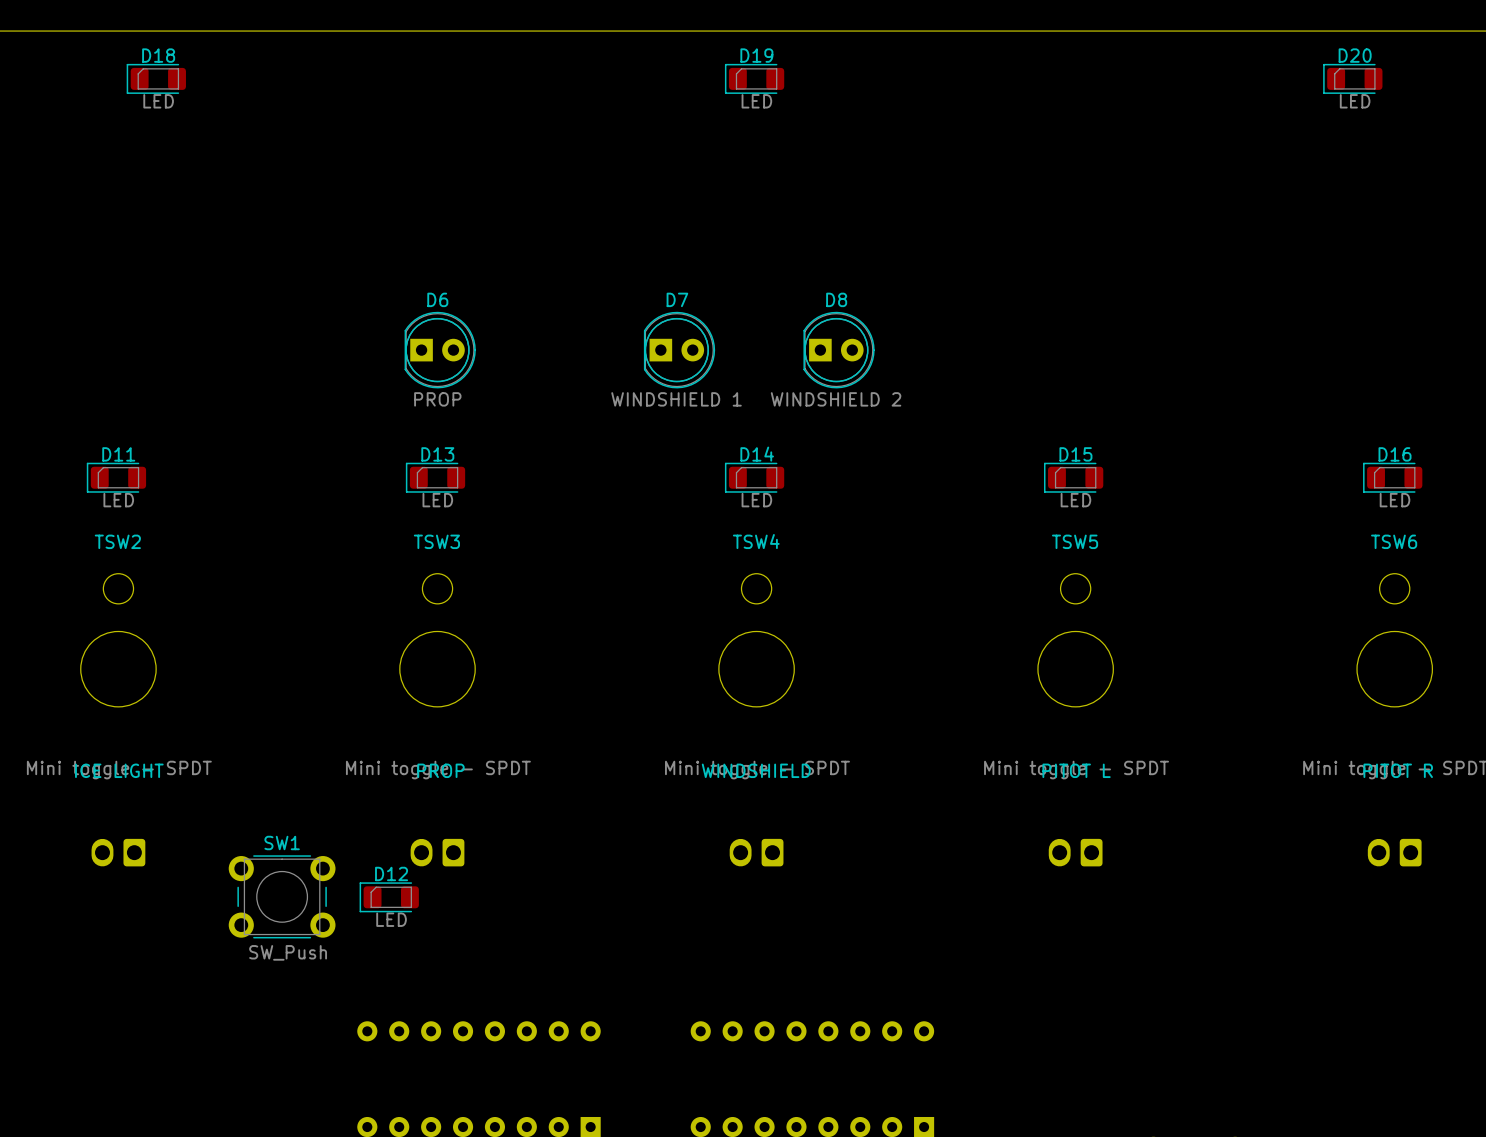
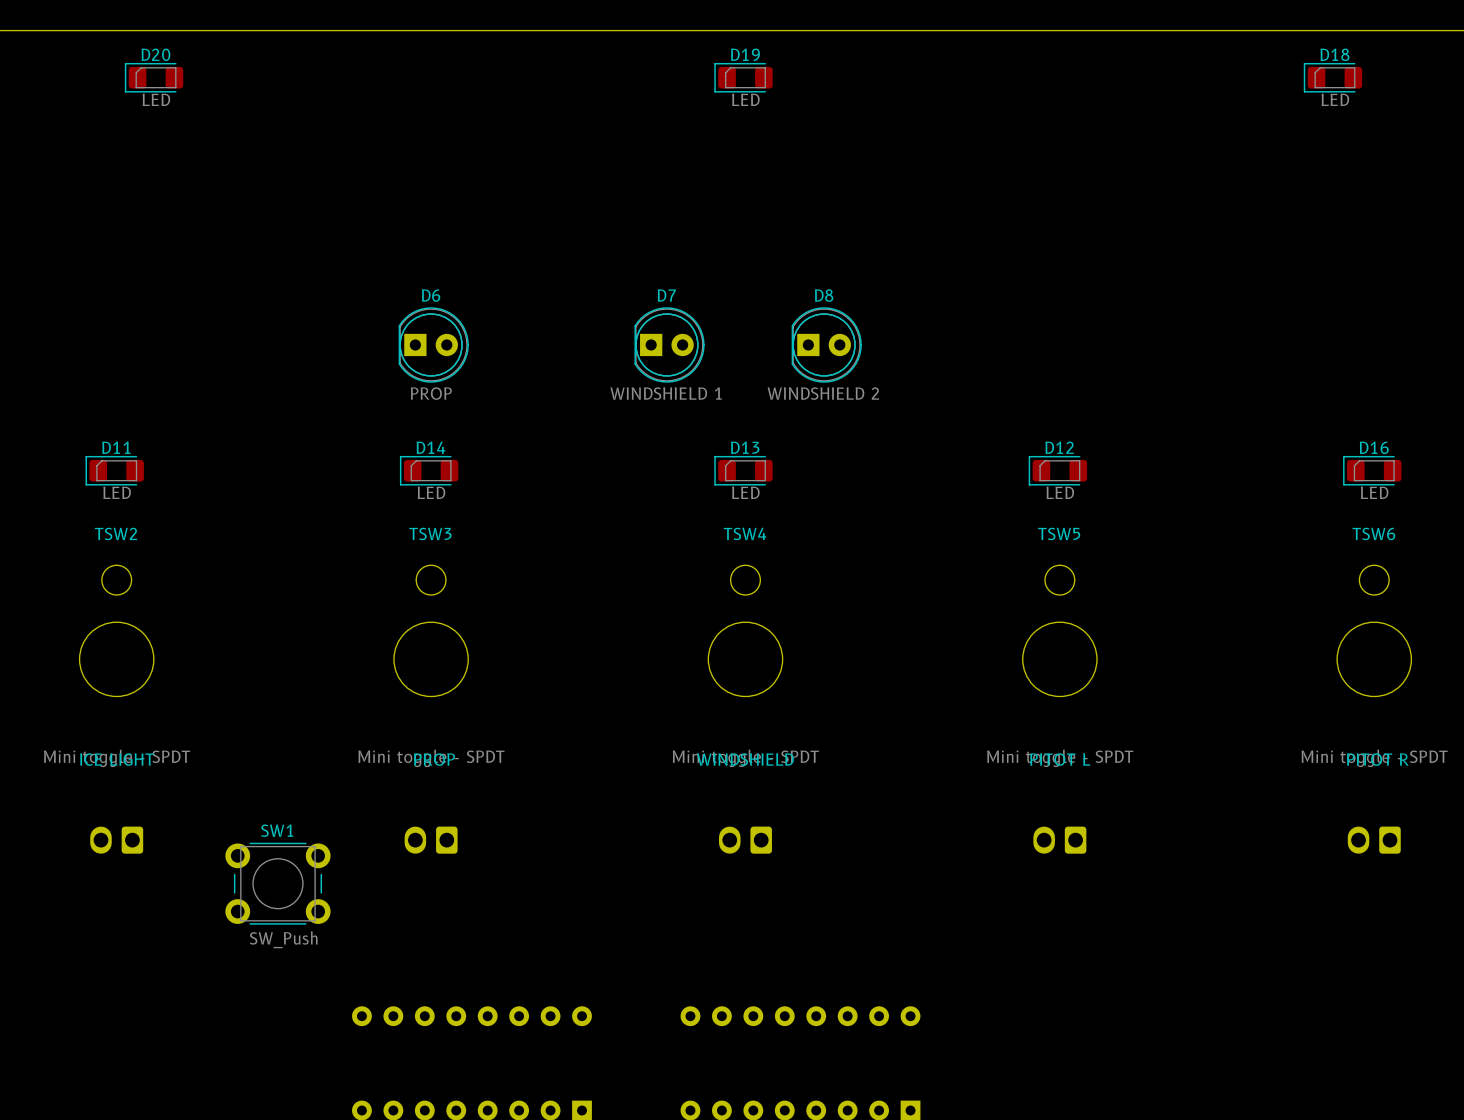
D18 name: D18 (158, 55) -> D20 (155, 54)
D20 name: D20 (1355, 55) -> D18 (1334, 54)
D13 name: D13 (437, 454) -> D14 (430, 447)
D14 name: D14 (757, 454) -> D13 (745, 447)
D15 name: D15 (1075, 454) -> D12 (1059, 447)
D12: LED (389, 897) -> none

